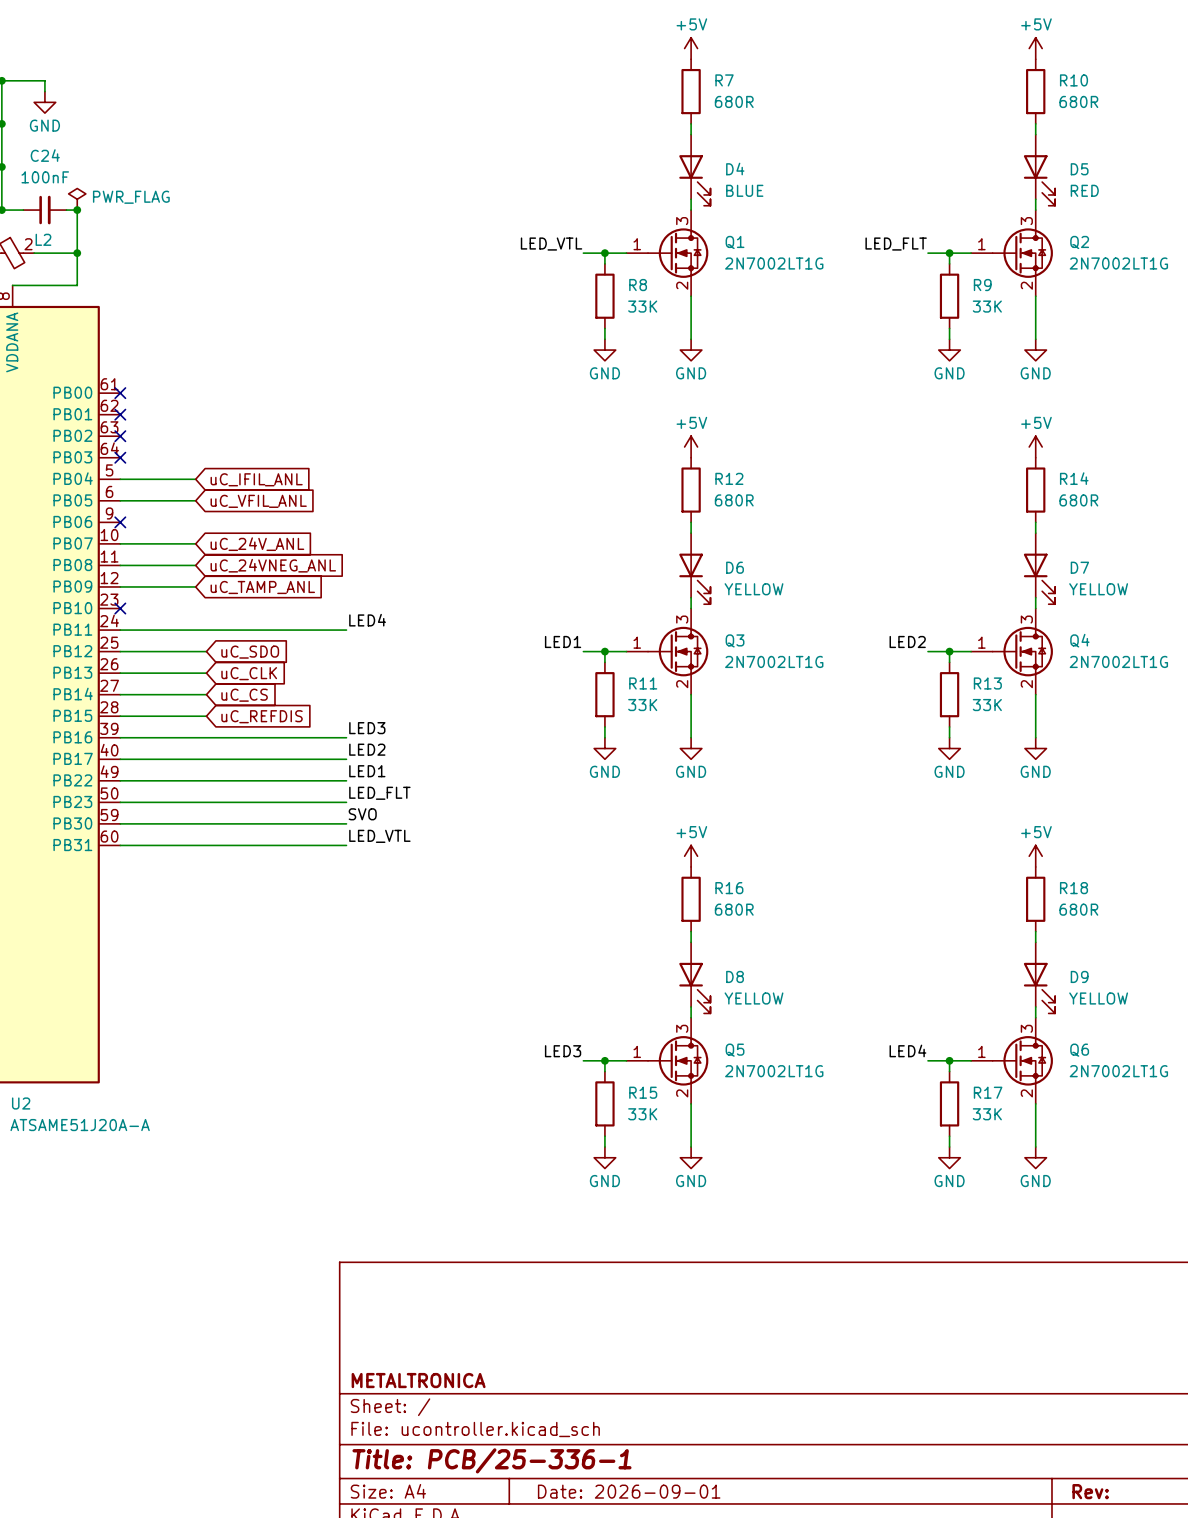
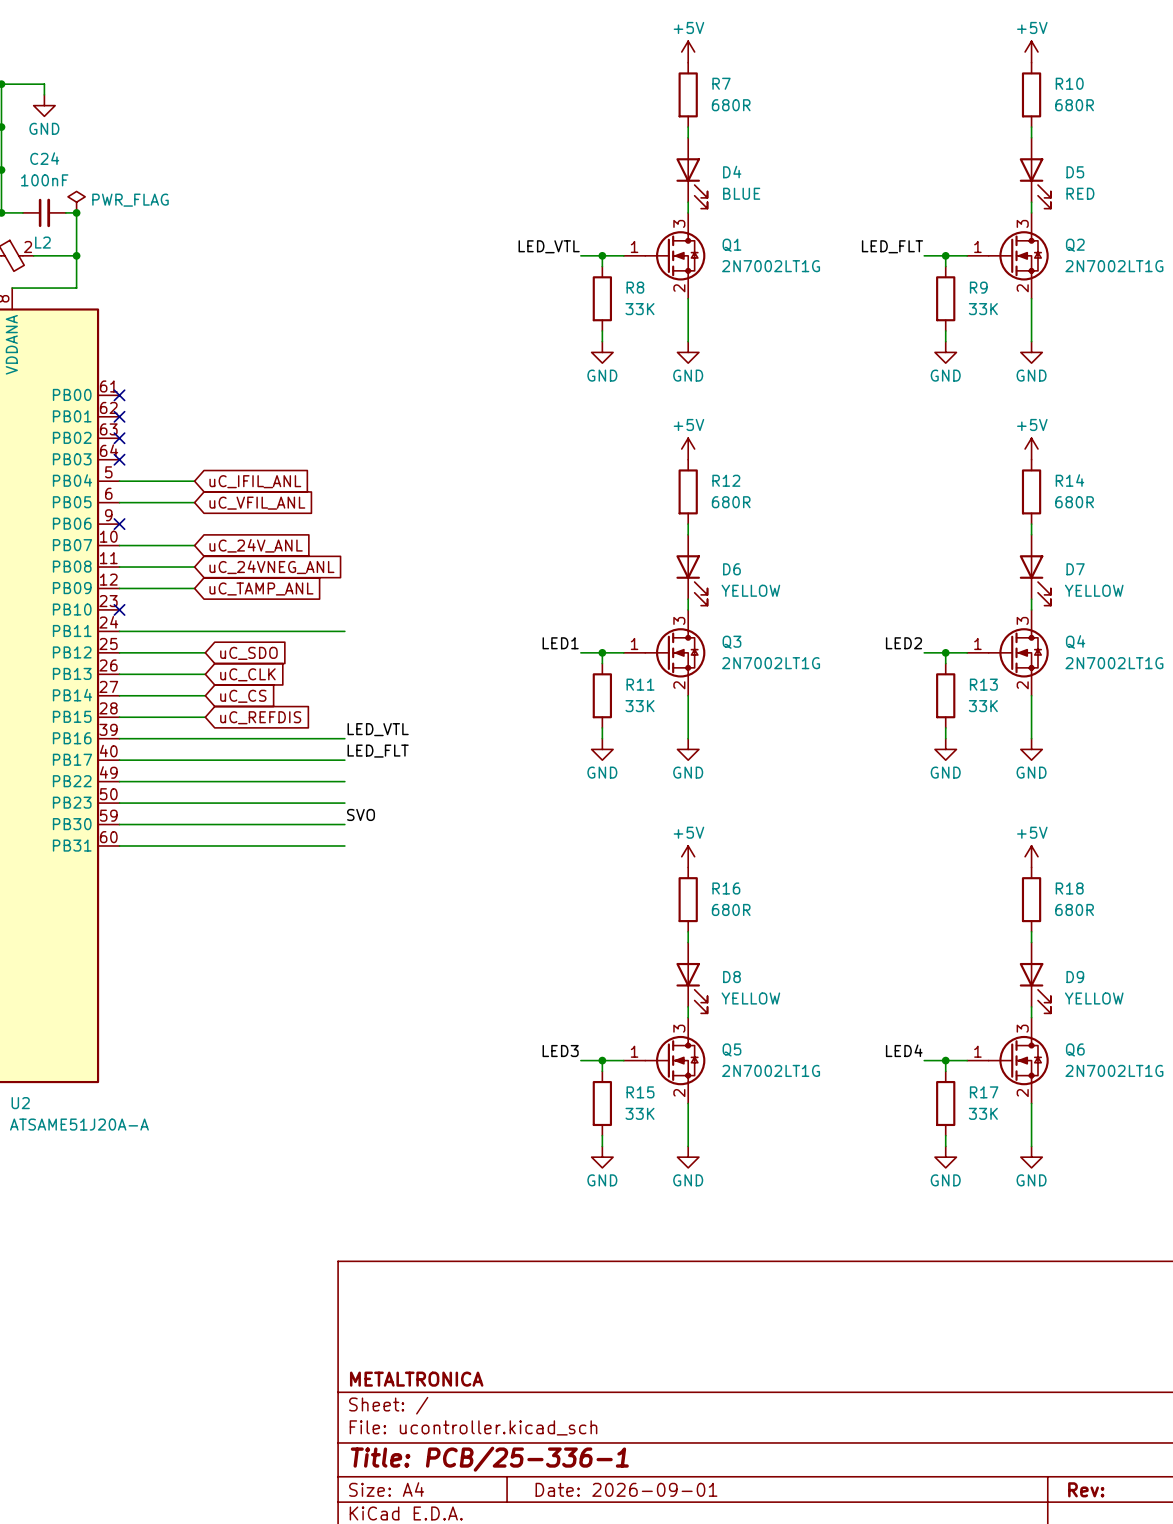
label: LED4 (367, 620) -> none
label: LED3 (367, 728) -> LED_VTL (378, 729)
label: LED2 (367, 749) -> LED_FLT (378, 751)
label: LED1 (367, 771) -> none
label: LED_FLT (379, 793) -> none
label: LED_VTL (379, 836) -> none

